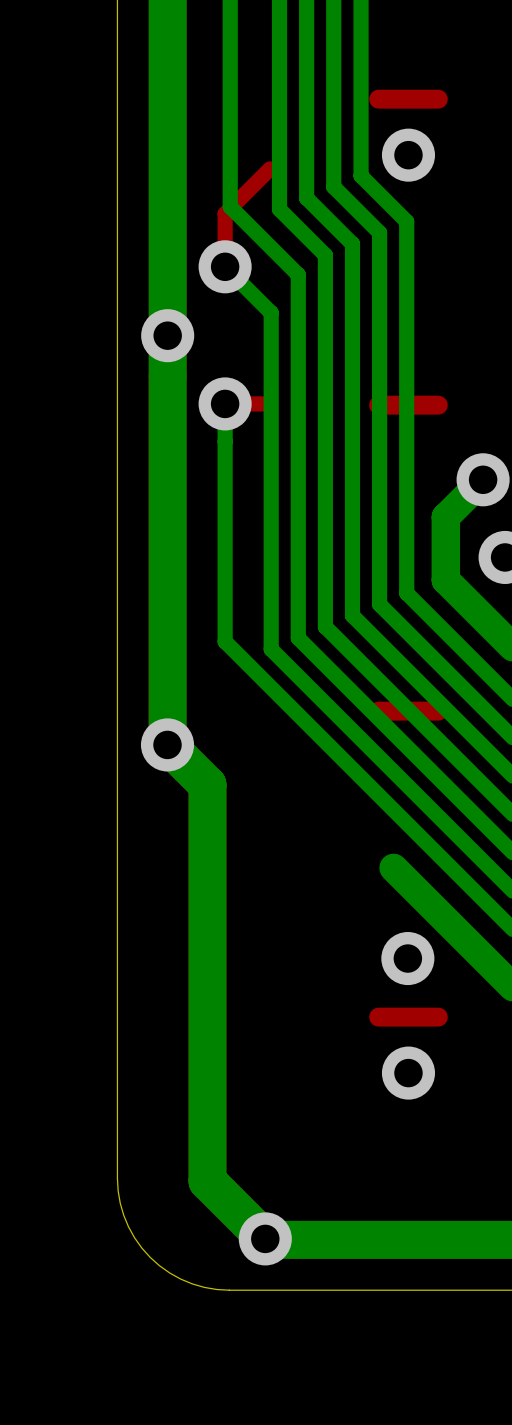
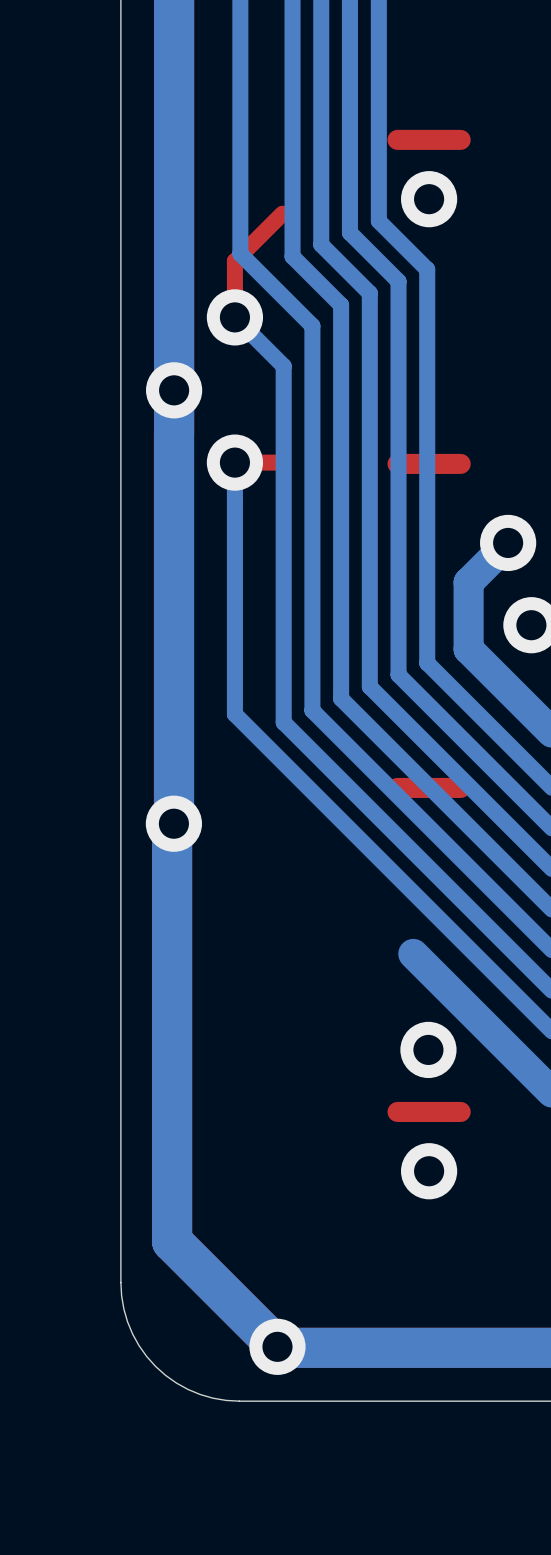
bottom track: (167, 744) (207, 784) (207, 1181) -> (173, 823) (172, 825) (172, 1241) (216, 1285)

